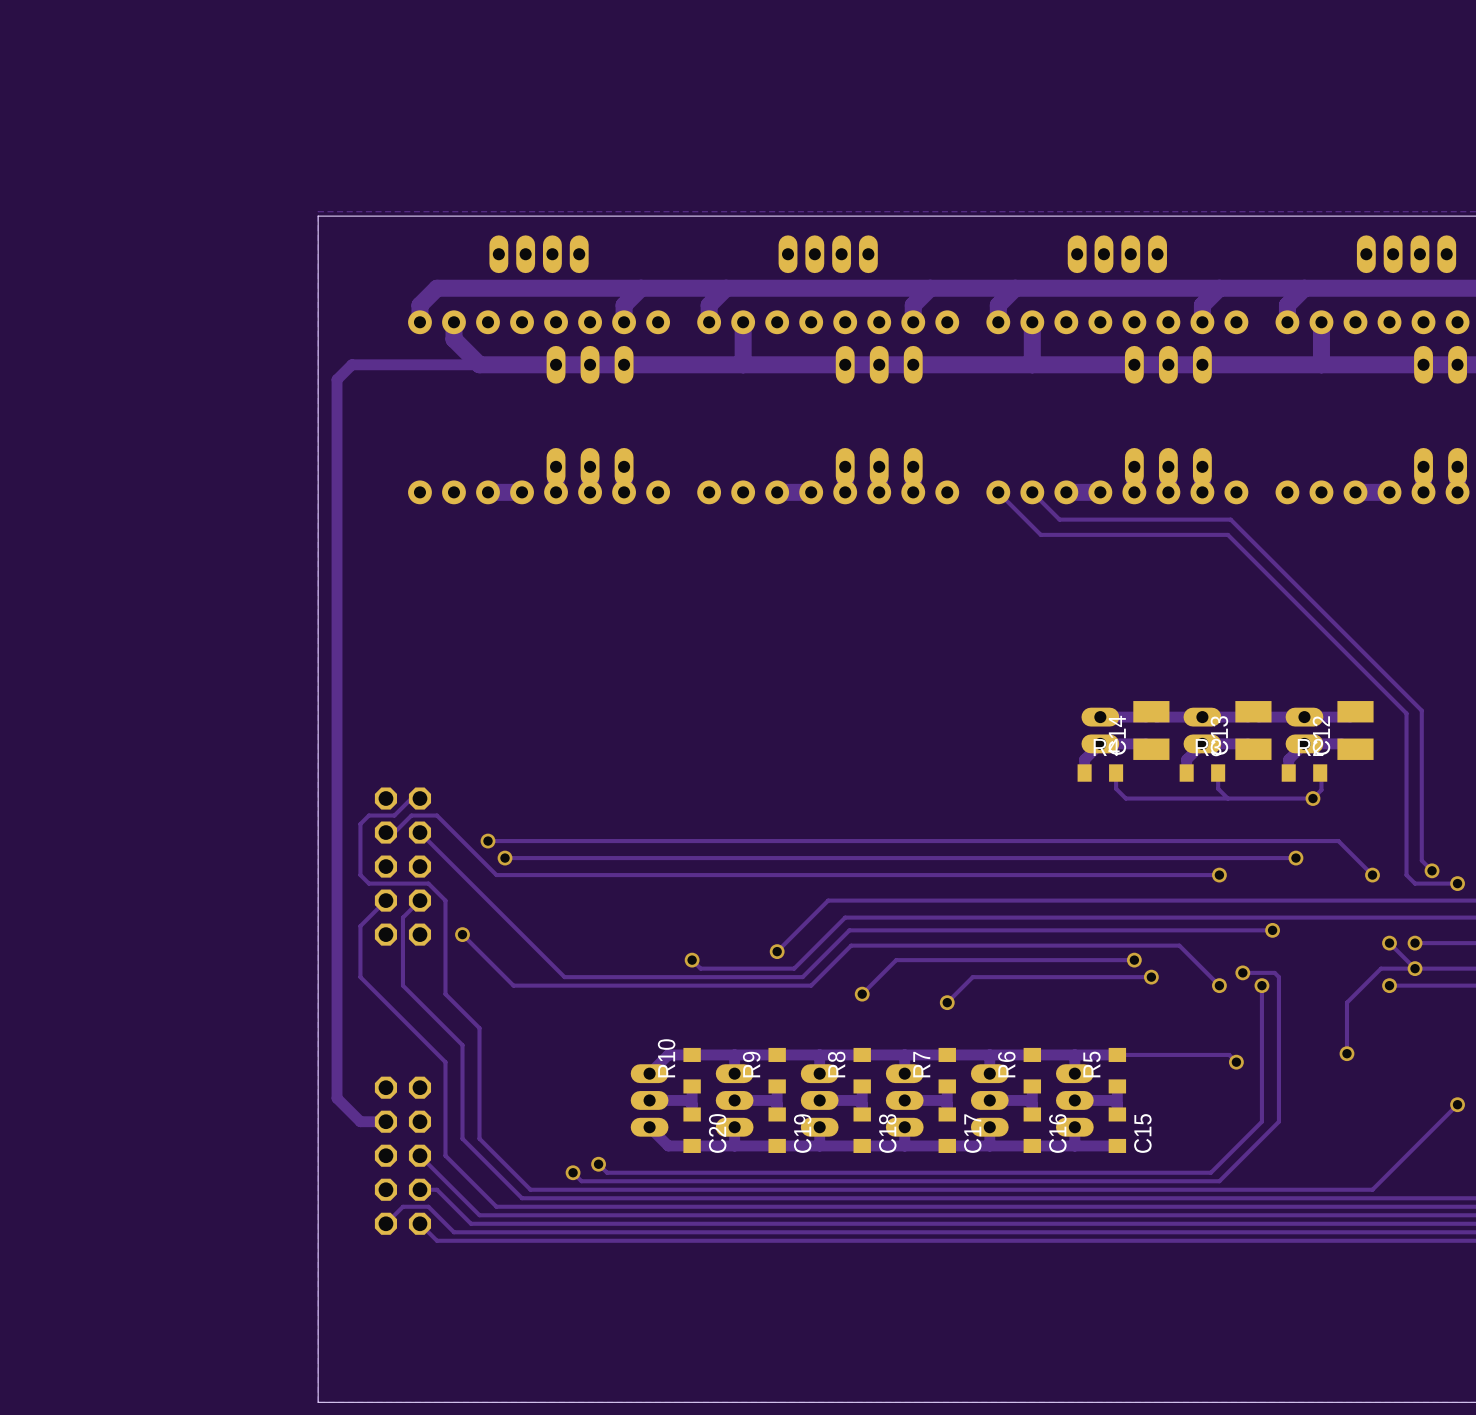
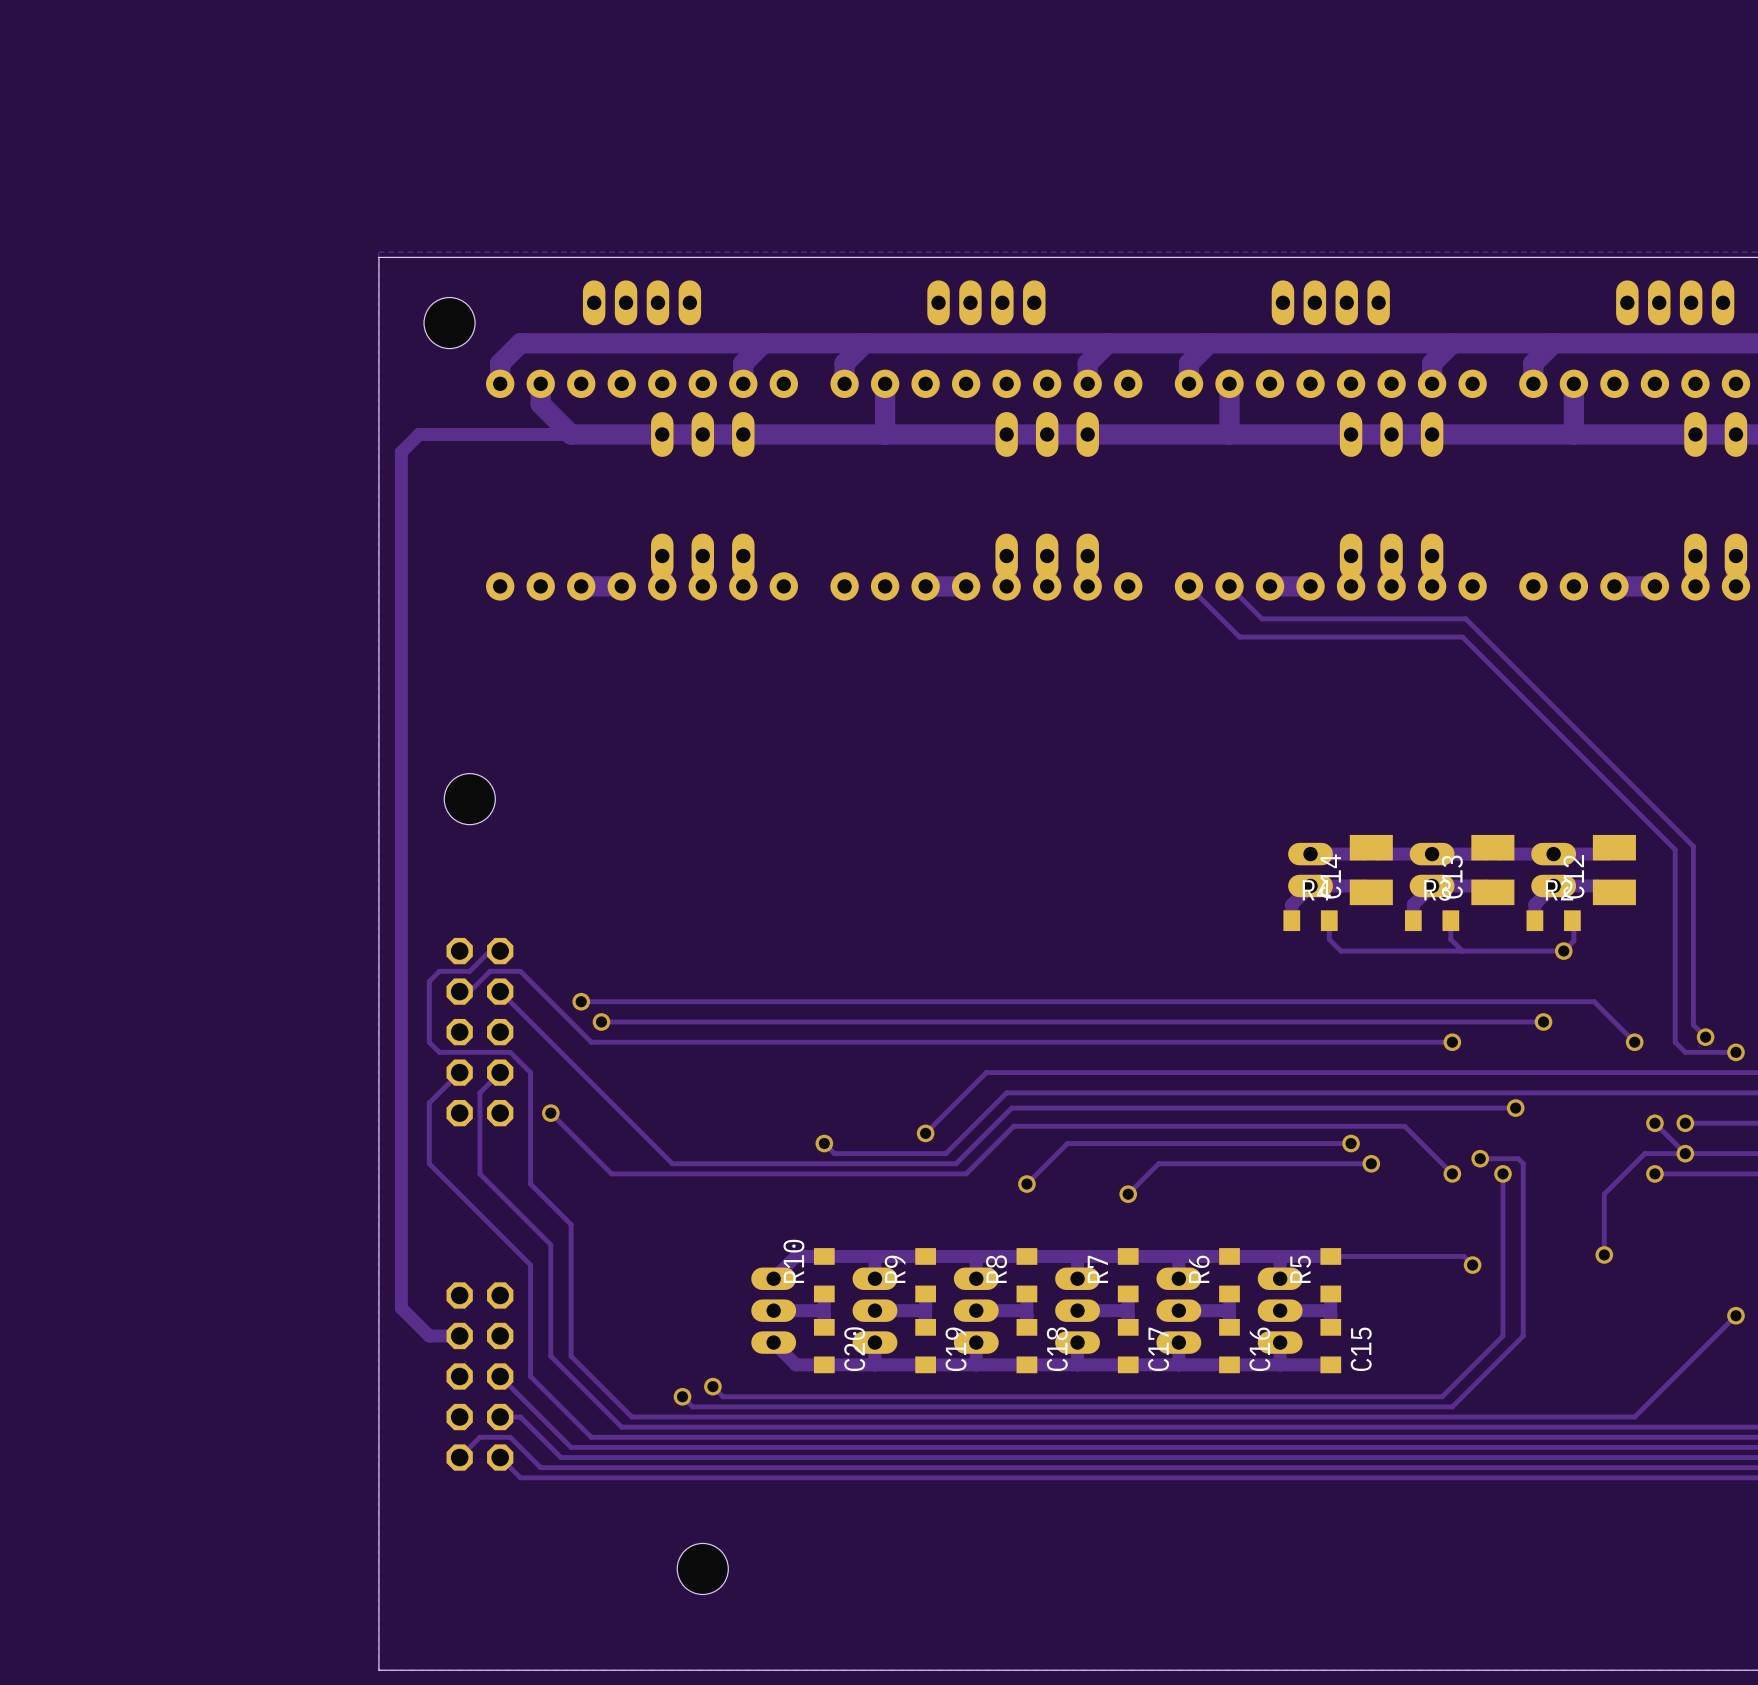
hole: none -> (449, 323)
hole: none -> (469, 799)
hole: none -> (702, 1568)

